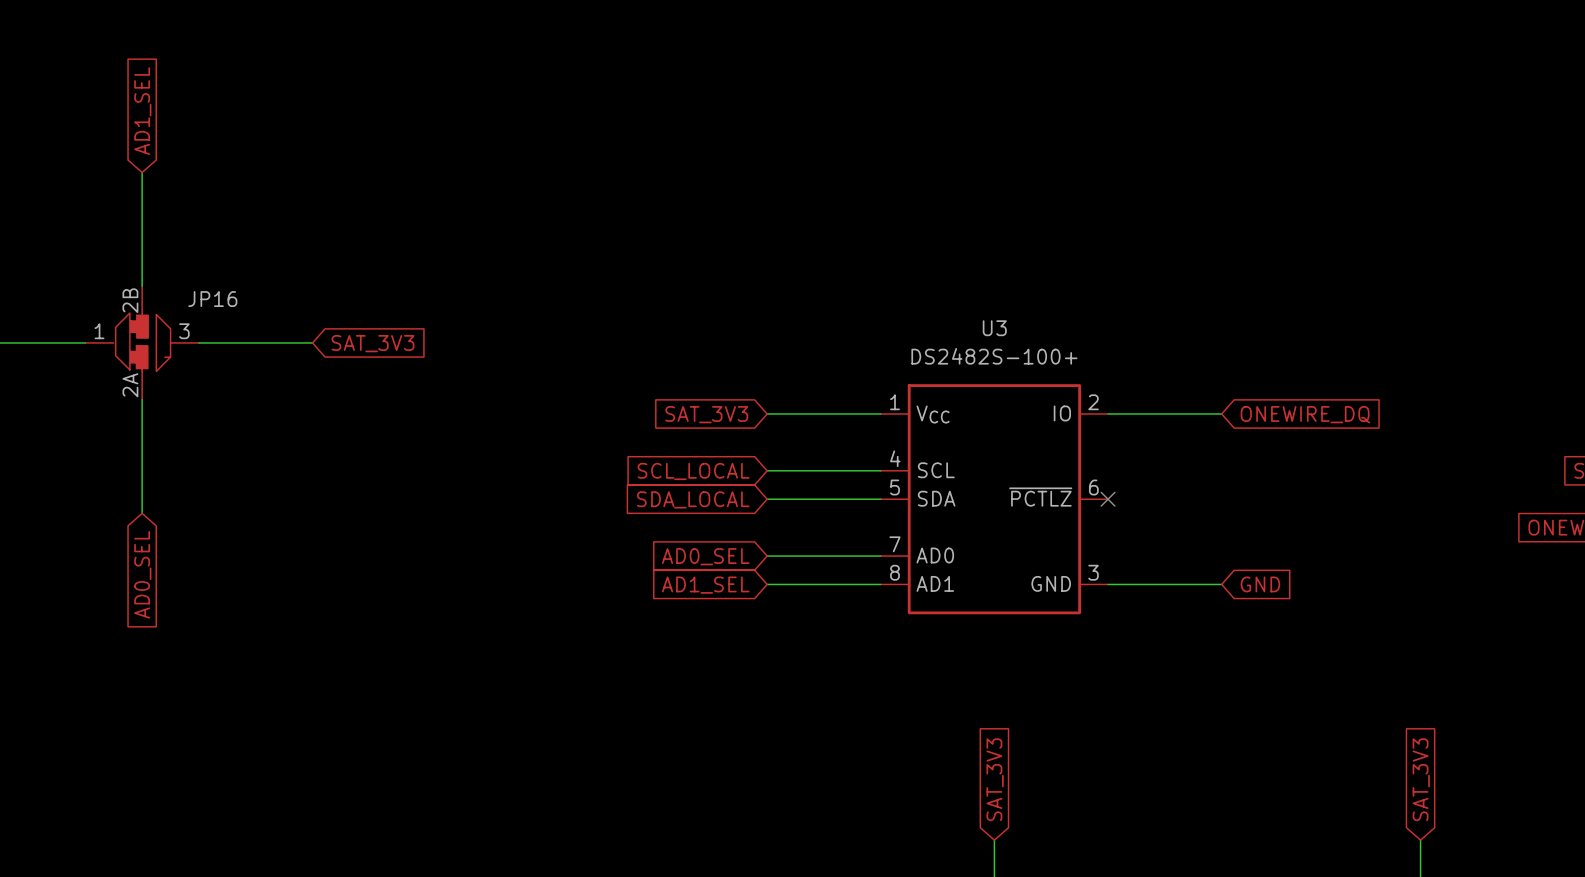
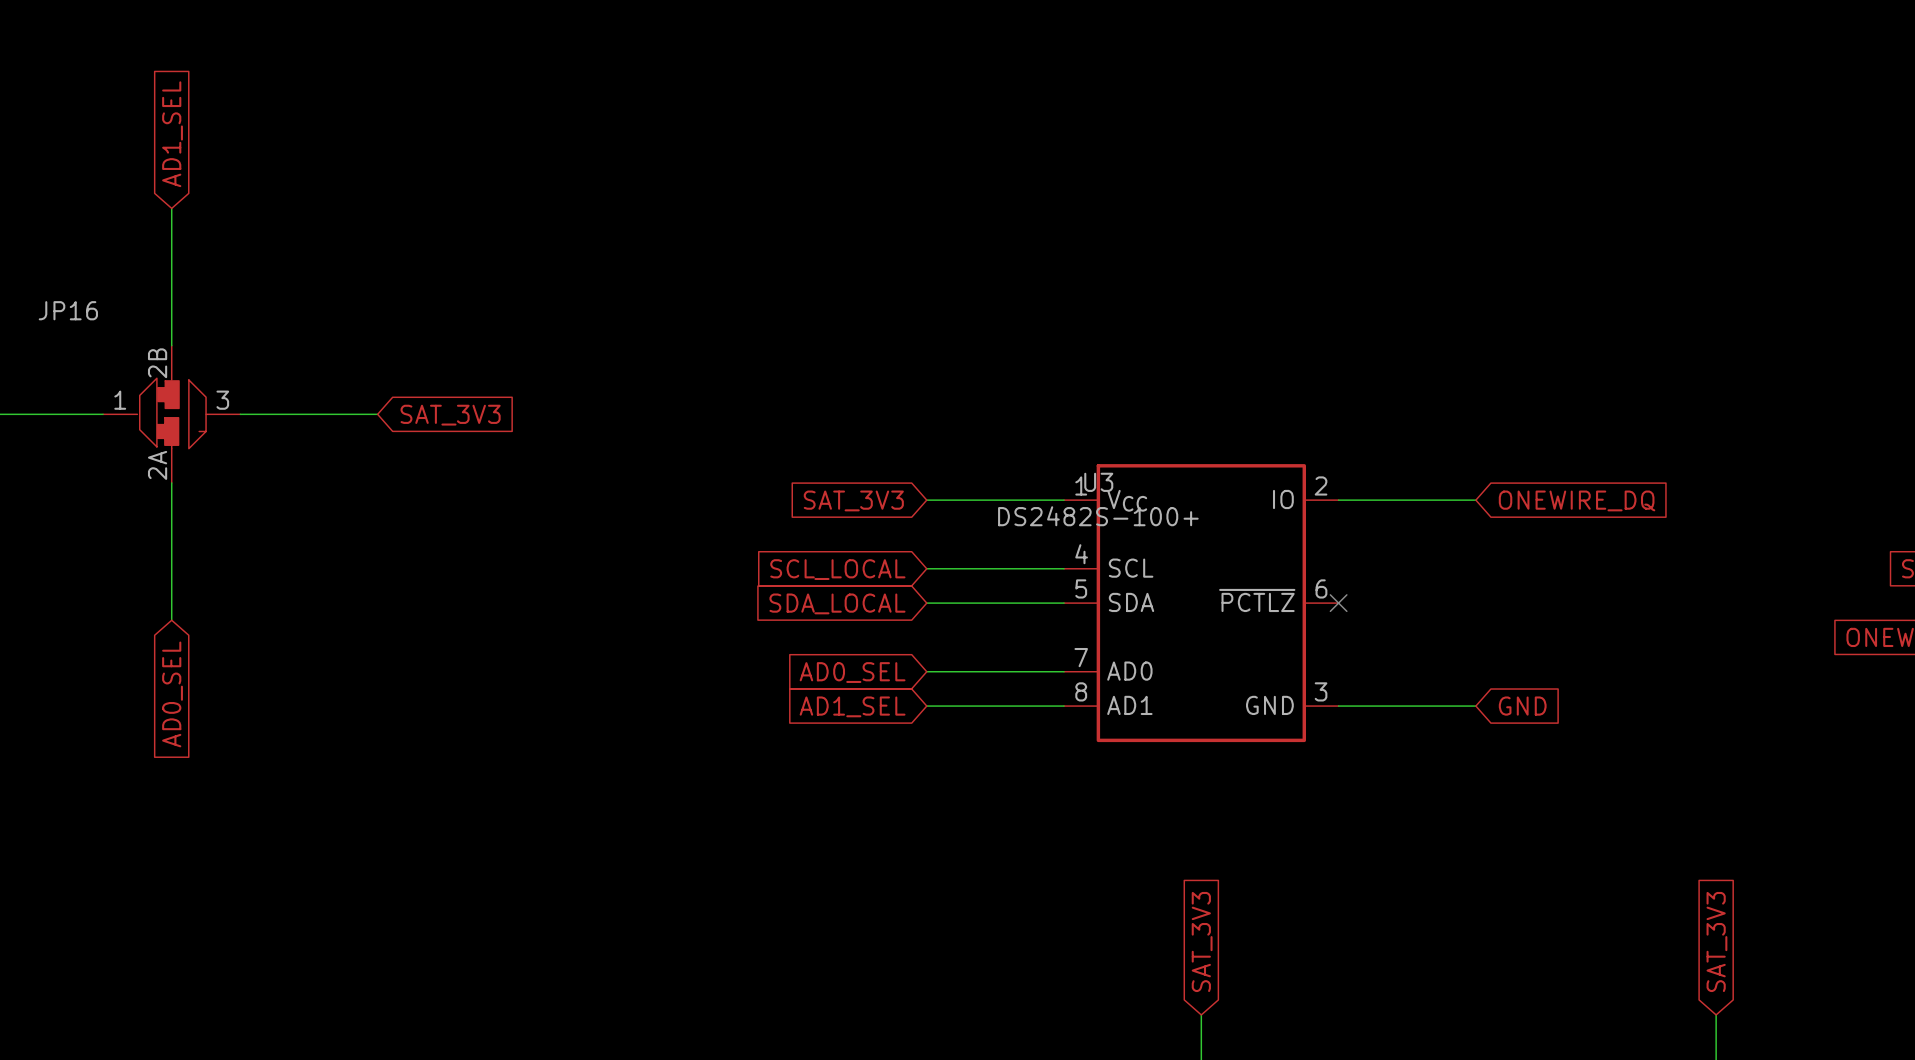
JP16 name position: JP16 (212, 299) -> JP16 (68, 310)
U3 name position: U3 (994, 328) -> U3 (1098, 482)
U3 value position: DS2482S-100+ (994, 356) -> DS2482S-100+ (1098, 516)

